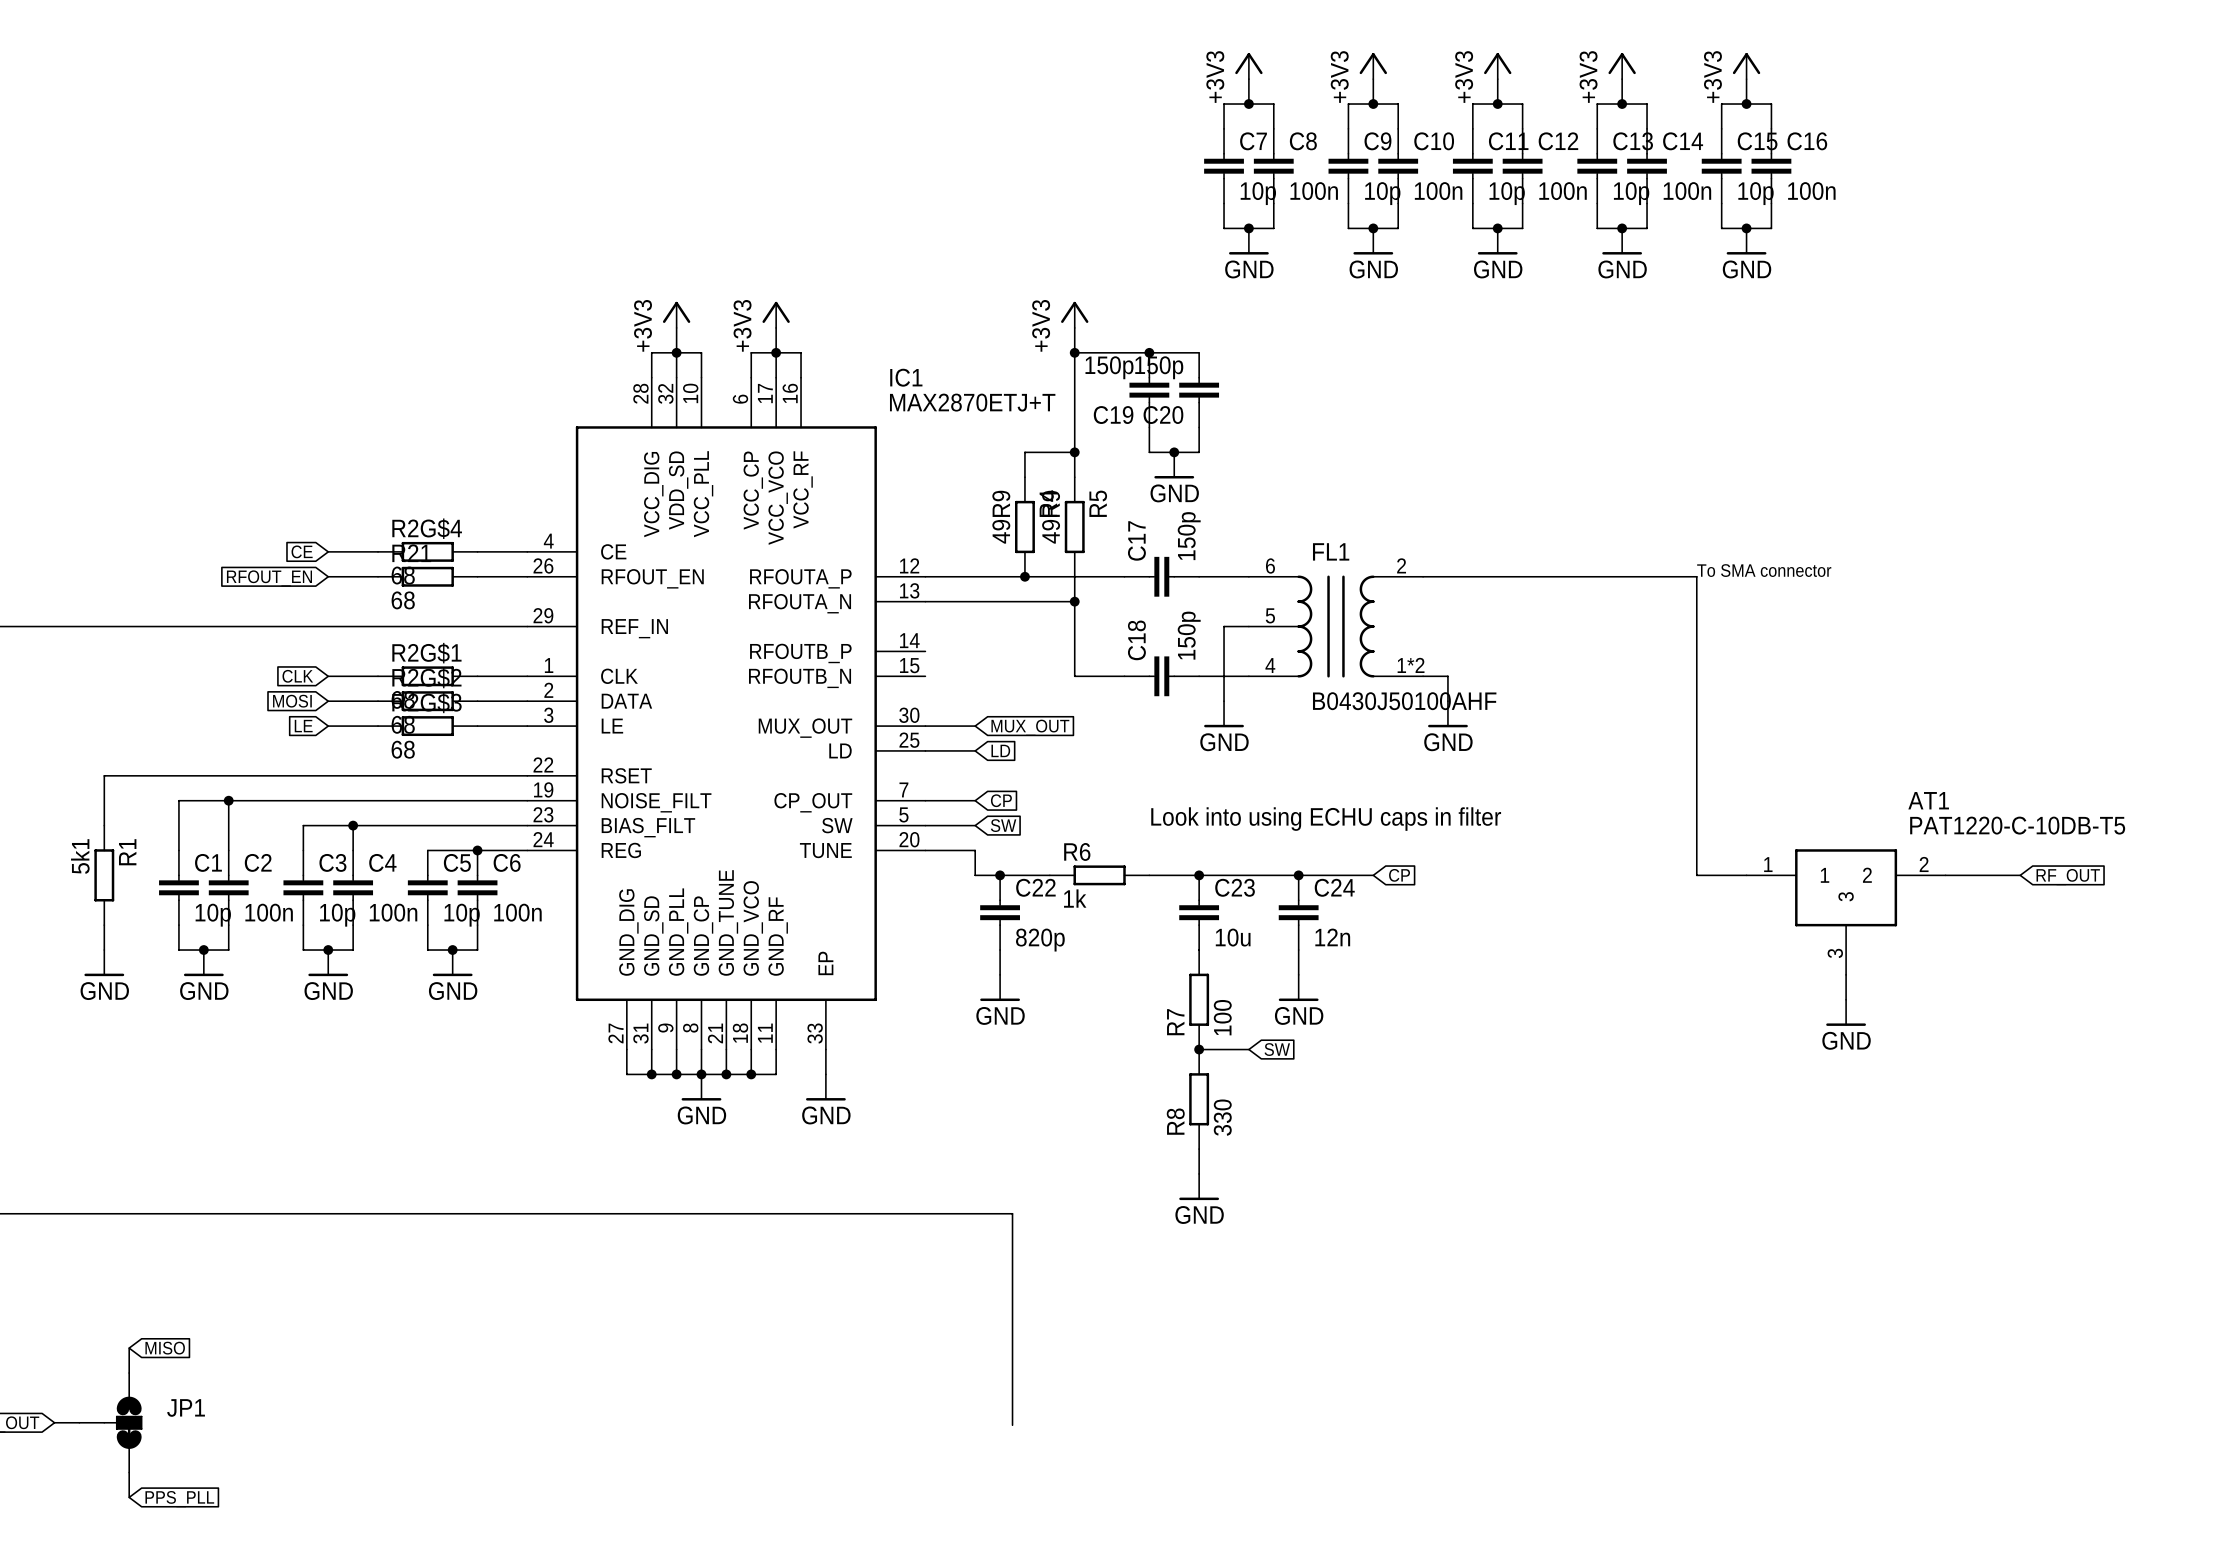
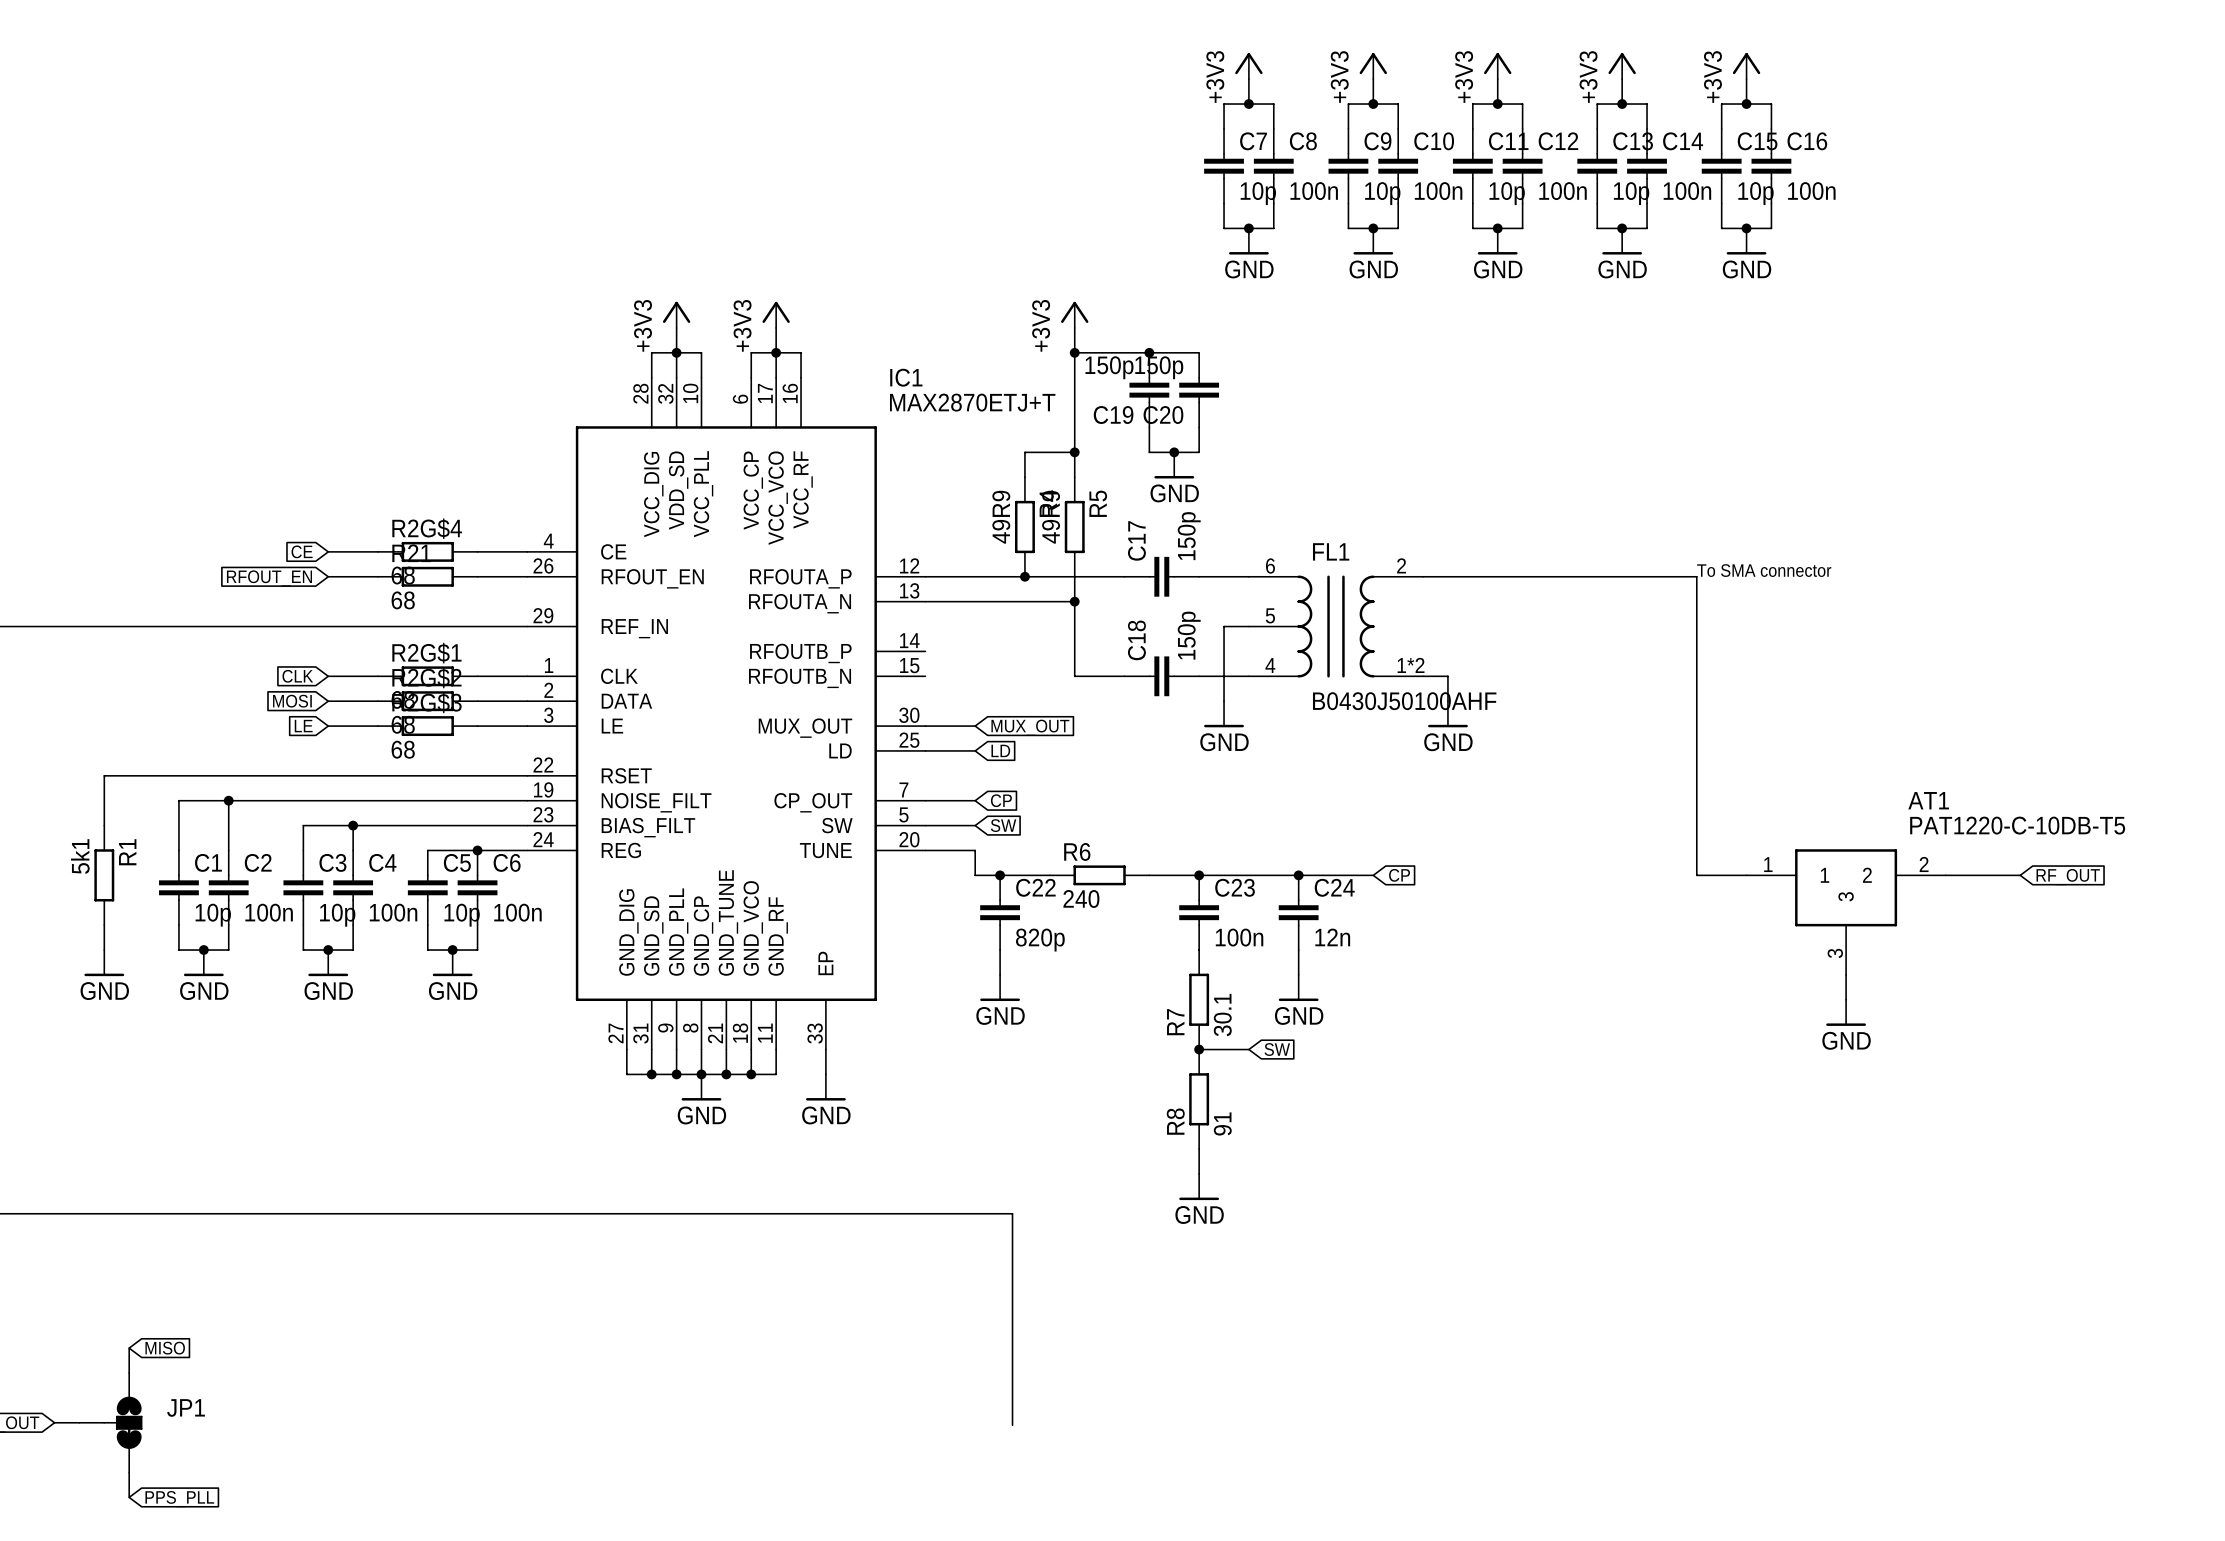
text: Look into using ECHU caps in filter (1326, 819) -> none
R6 value: 1k (1075, 898) -> 240 (1081, 899)
C23 value: 10u (1233, 937) -> 100n (1239, 937)
R7 value: 100 (1222, 1017) -> 30.1 (1222, 1015)
R8 value: 330 (1222, 1117) -> 91 (1222, 1123)

